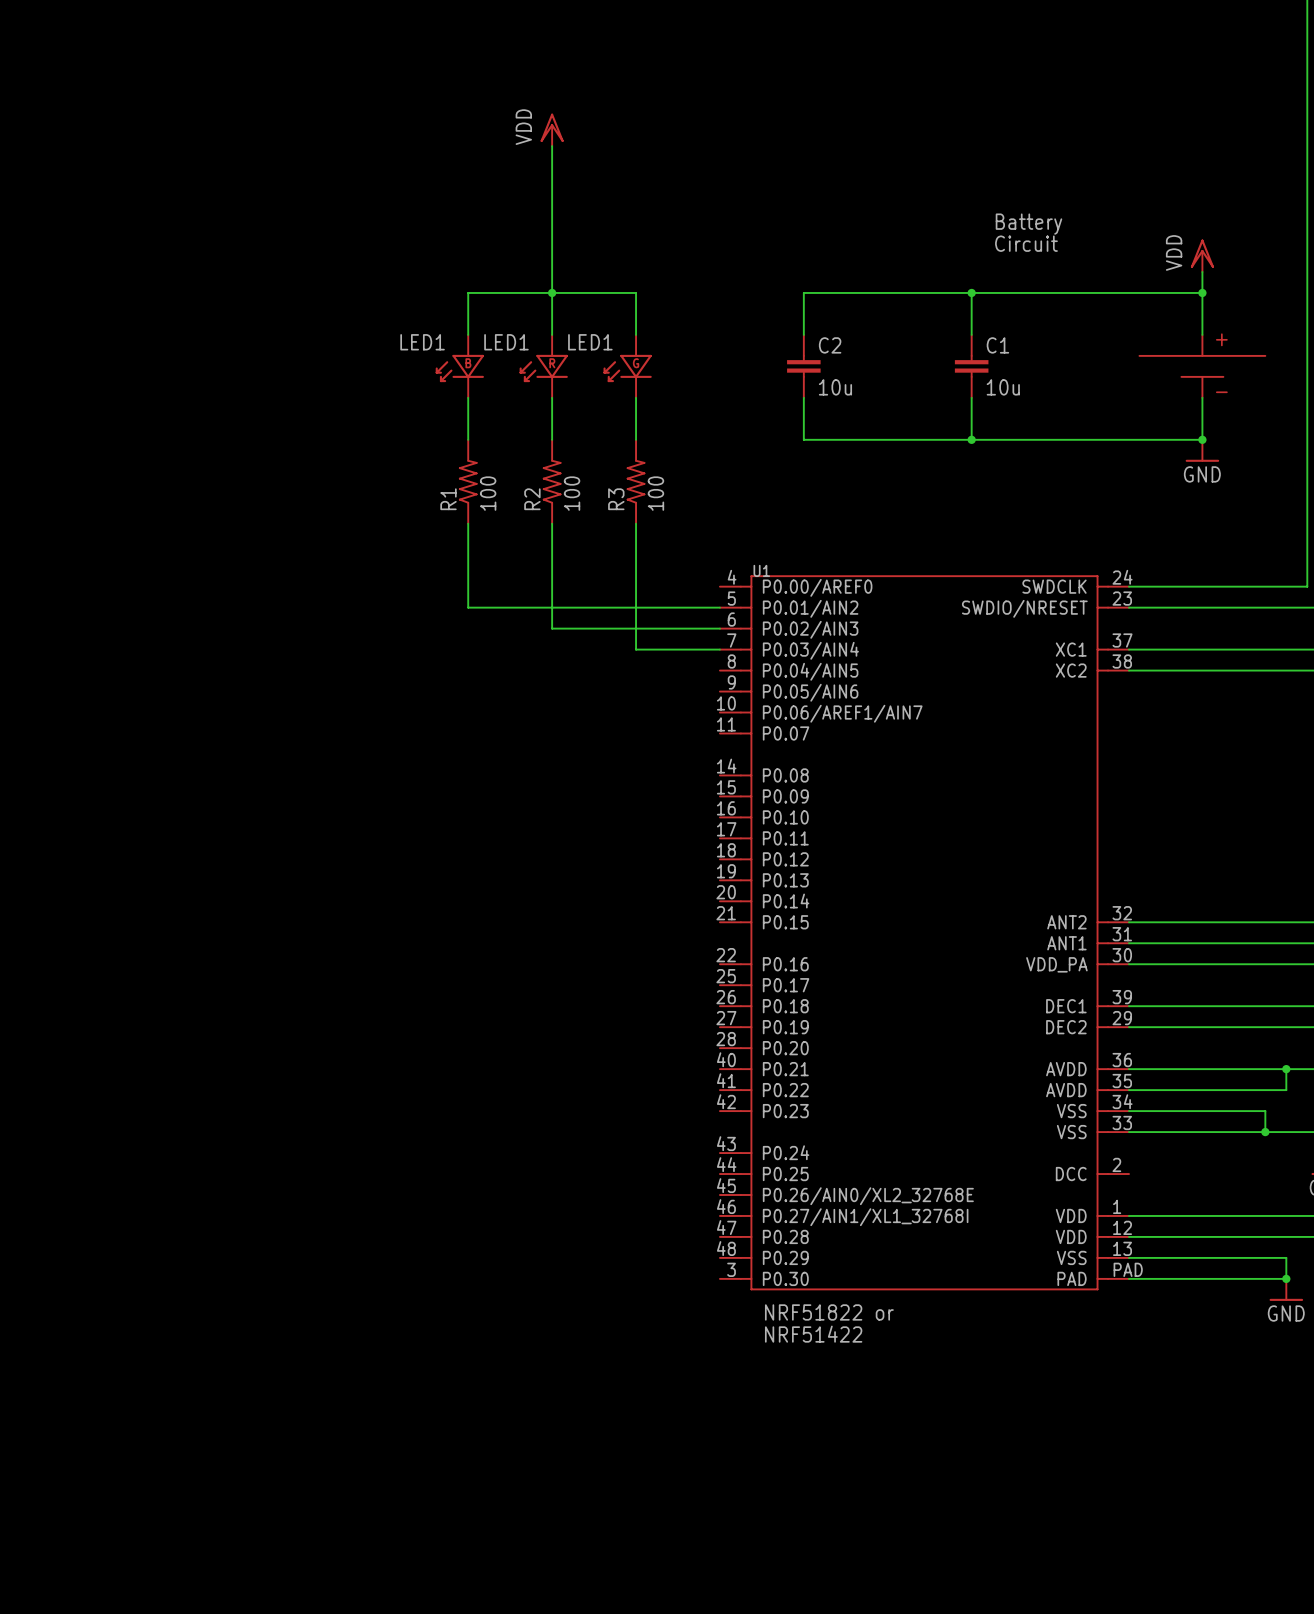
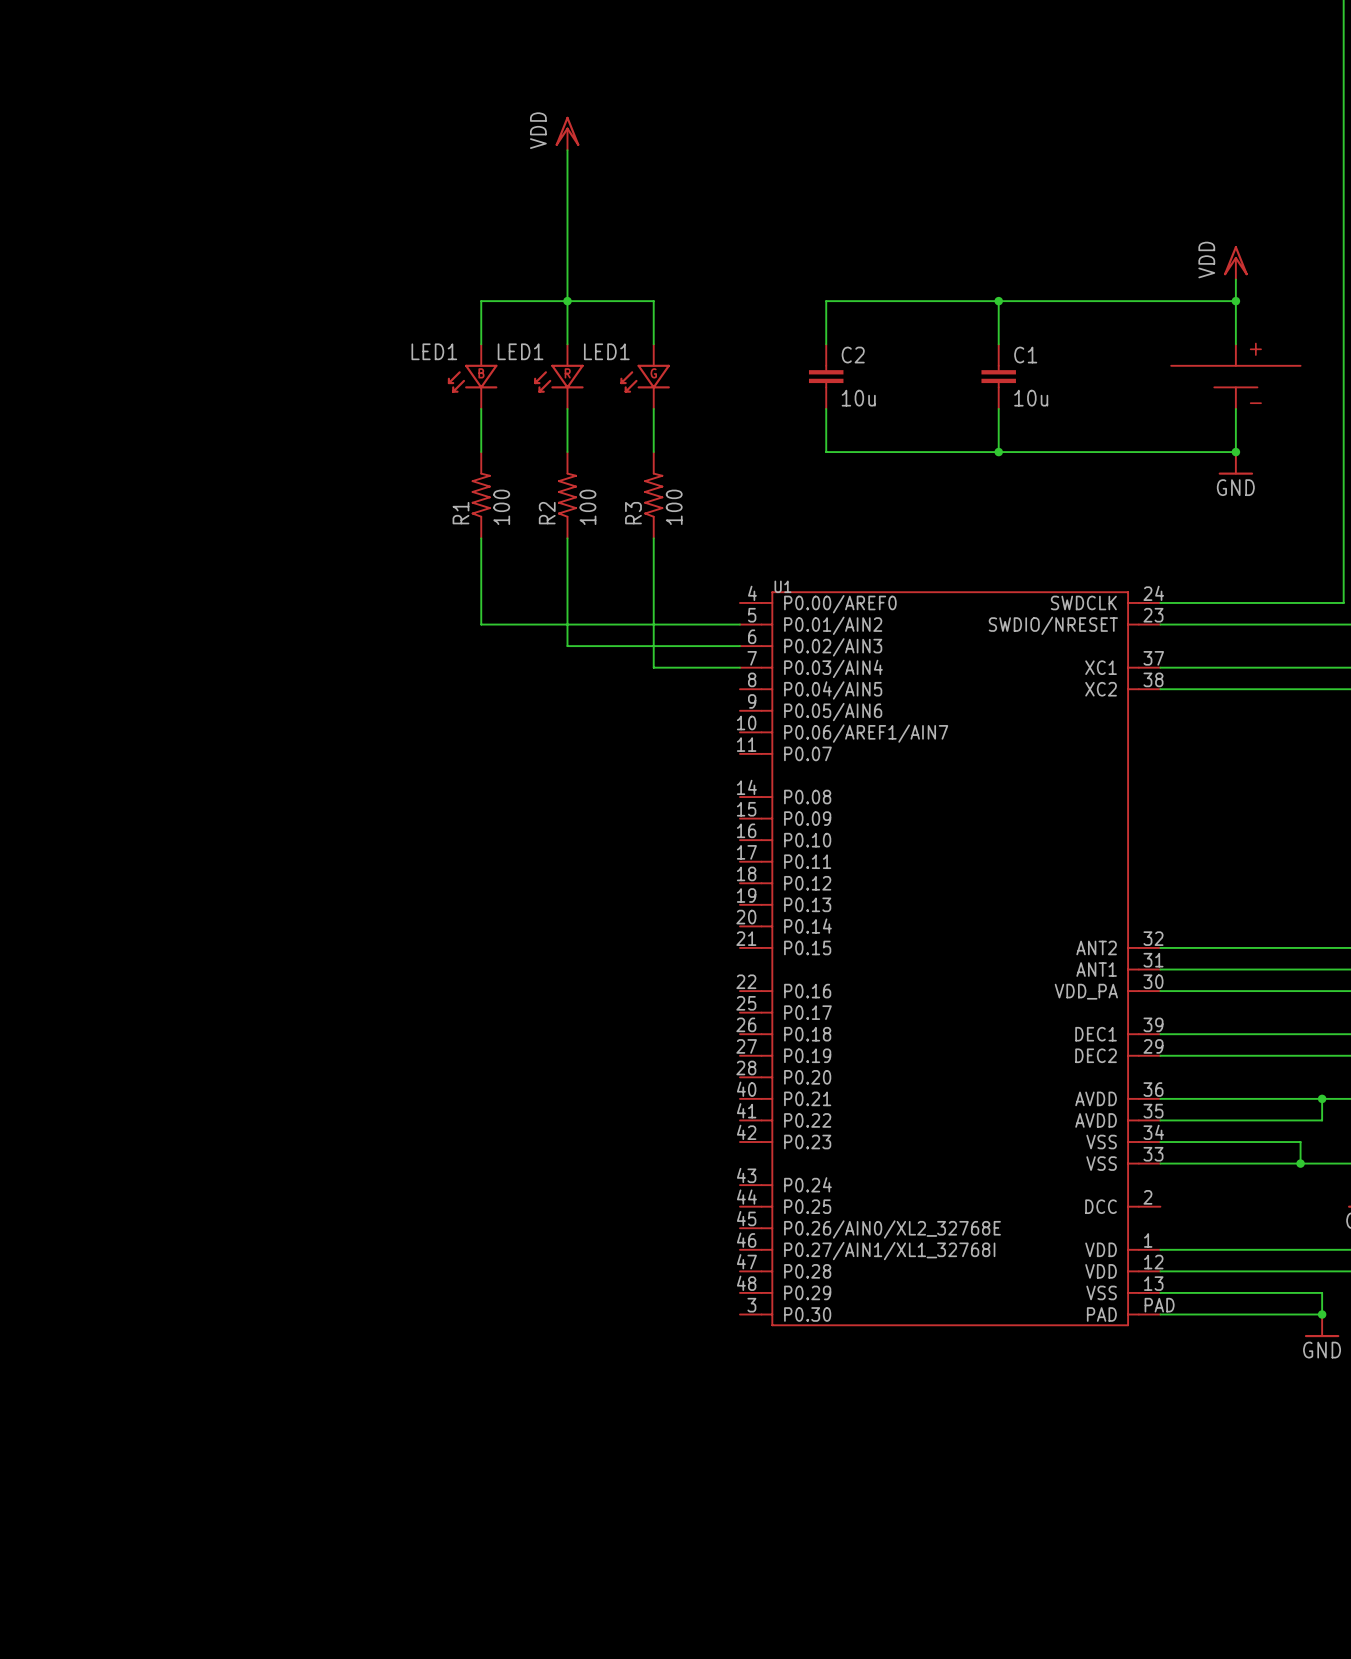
text: Battery (1028, 224) -> none
text: Circuit (1026, 243) -> none
text: NRF51822 or (829, 1312) -> none
text: NRF51422 (813, 1334) -> none

